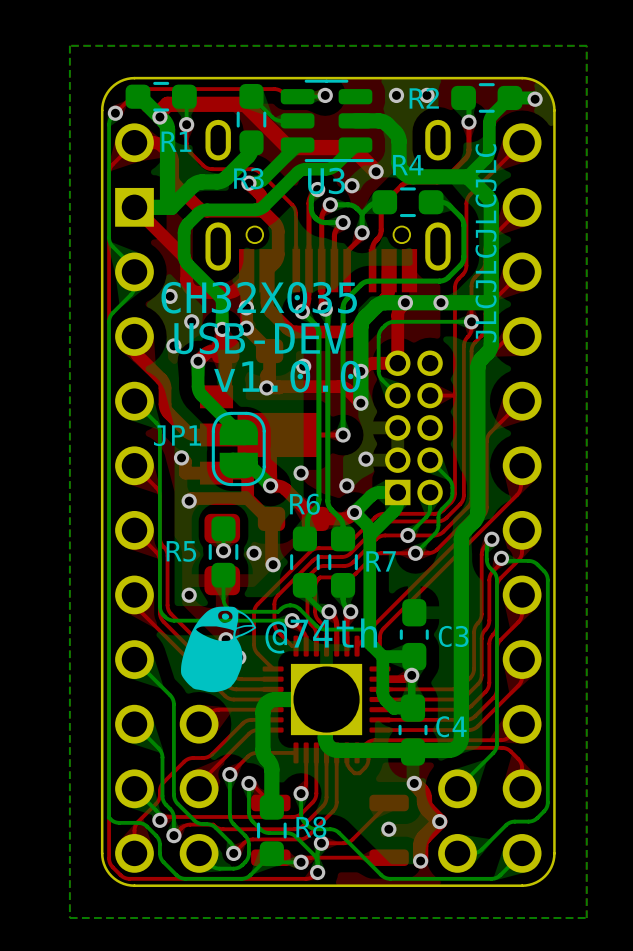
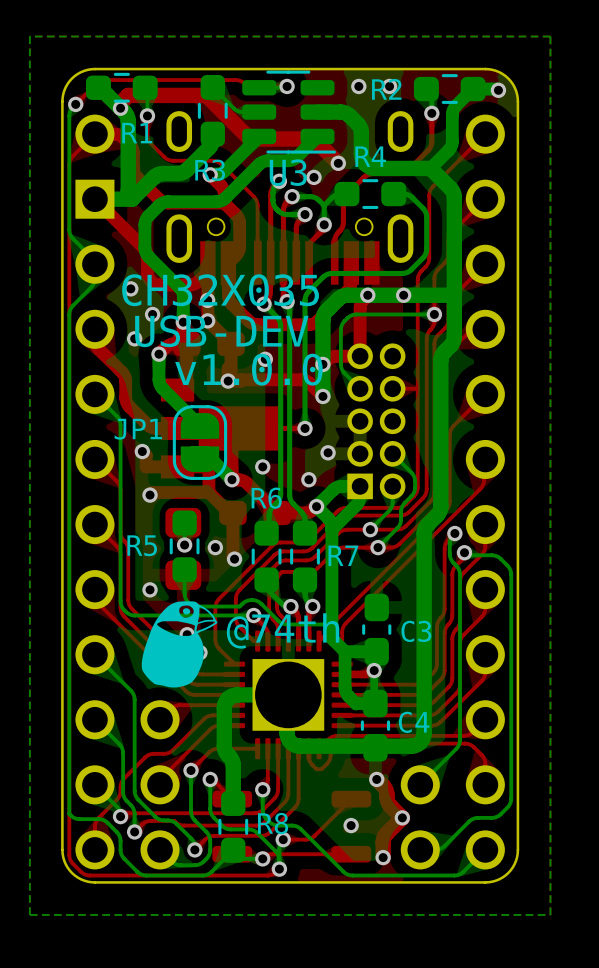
drawing: [475, 144, 497, 343] -> none

